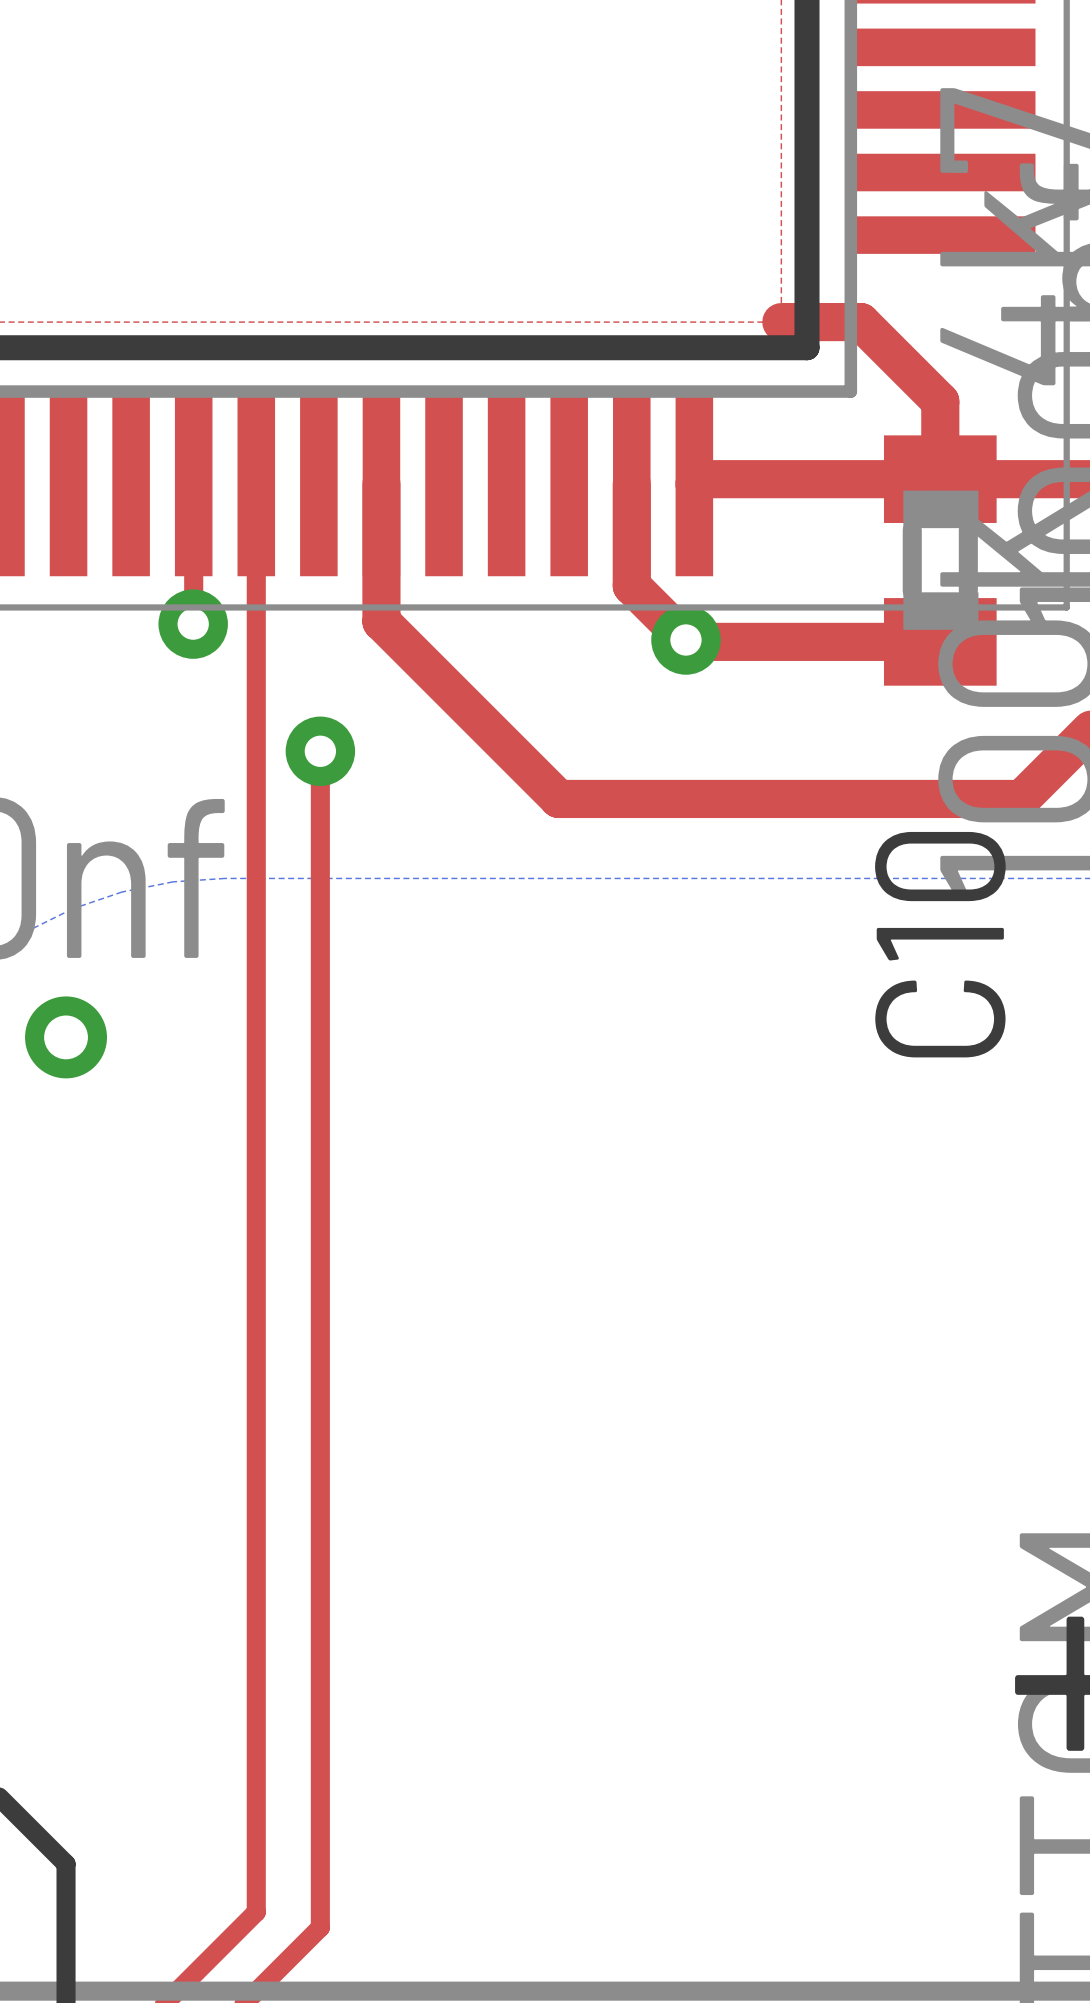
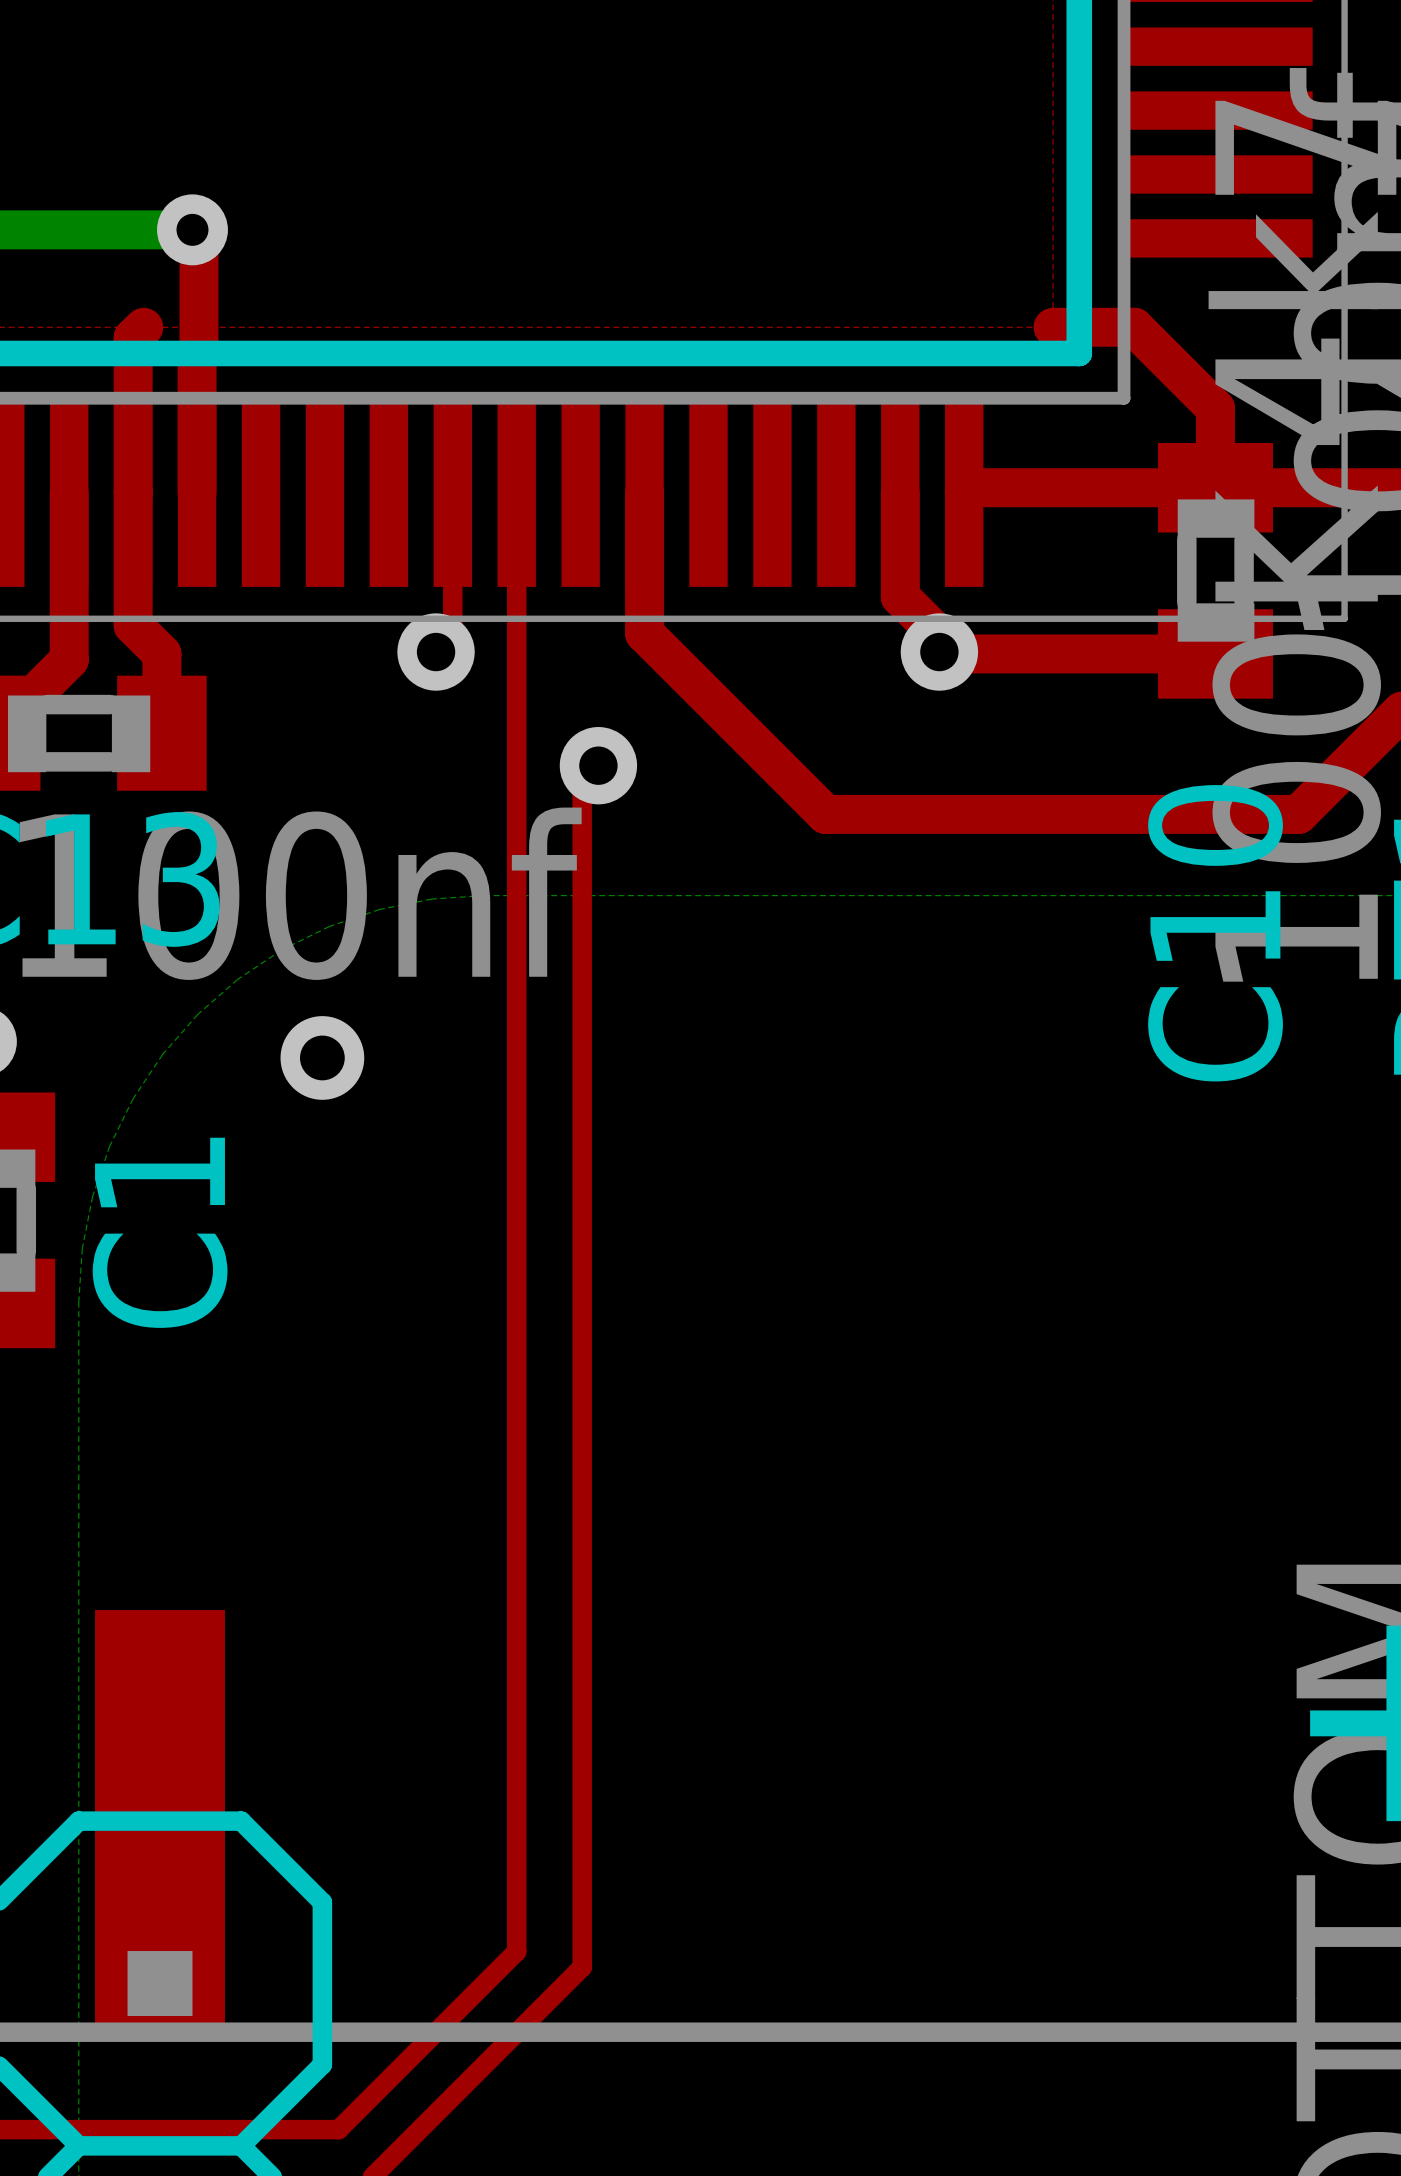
via position: (193, 624) -> (436, 652)
via position: (685, 640) -> (939, 652)
via position: (320, 751) -> (598, 765)

